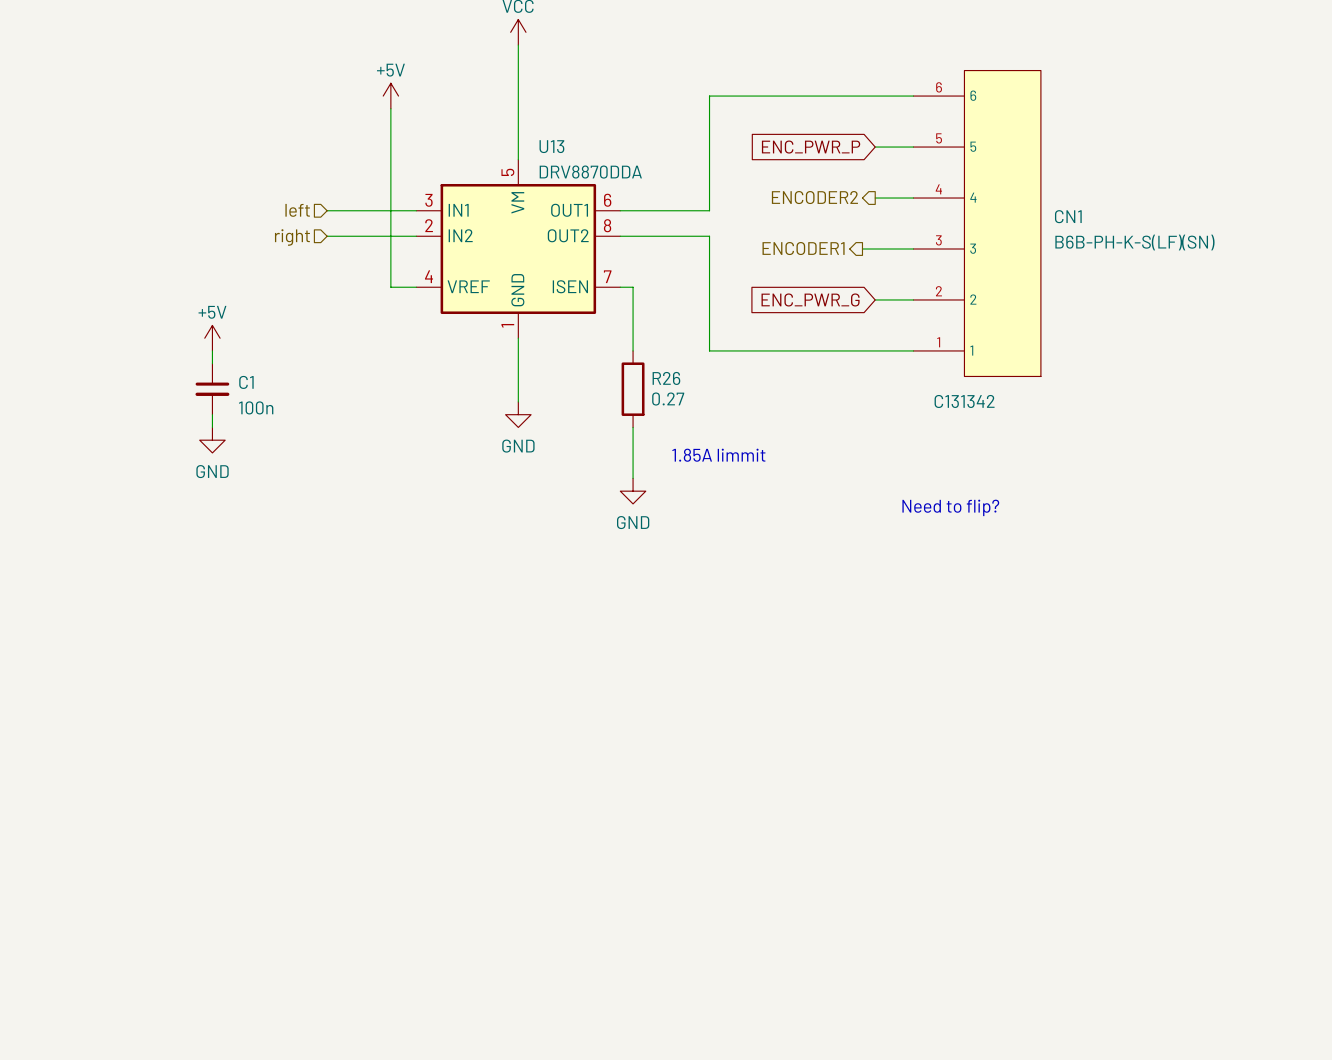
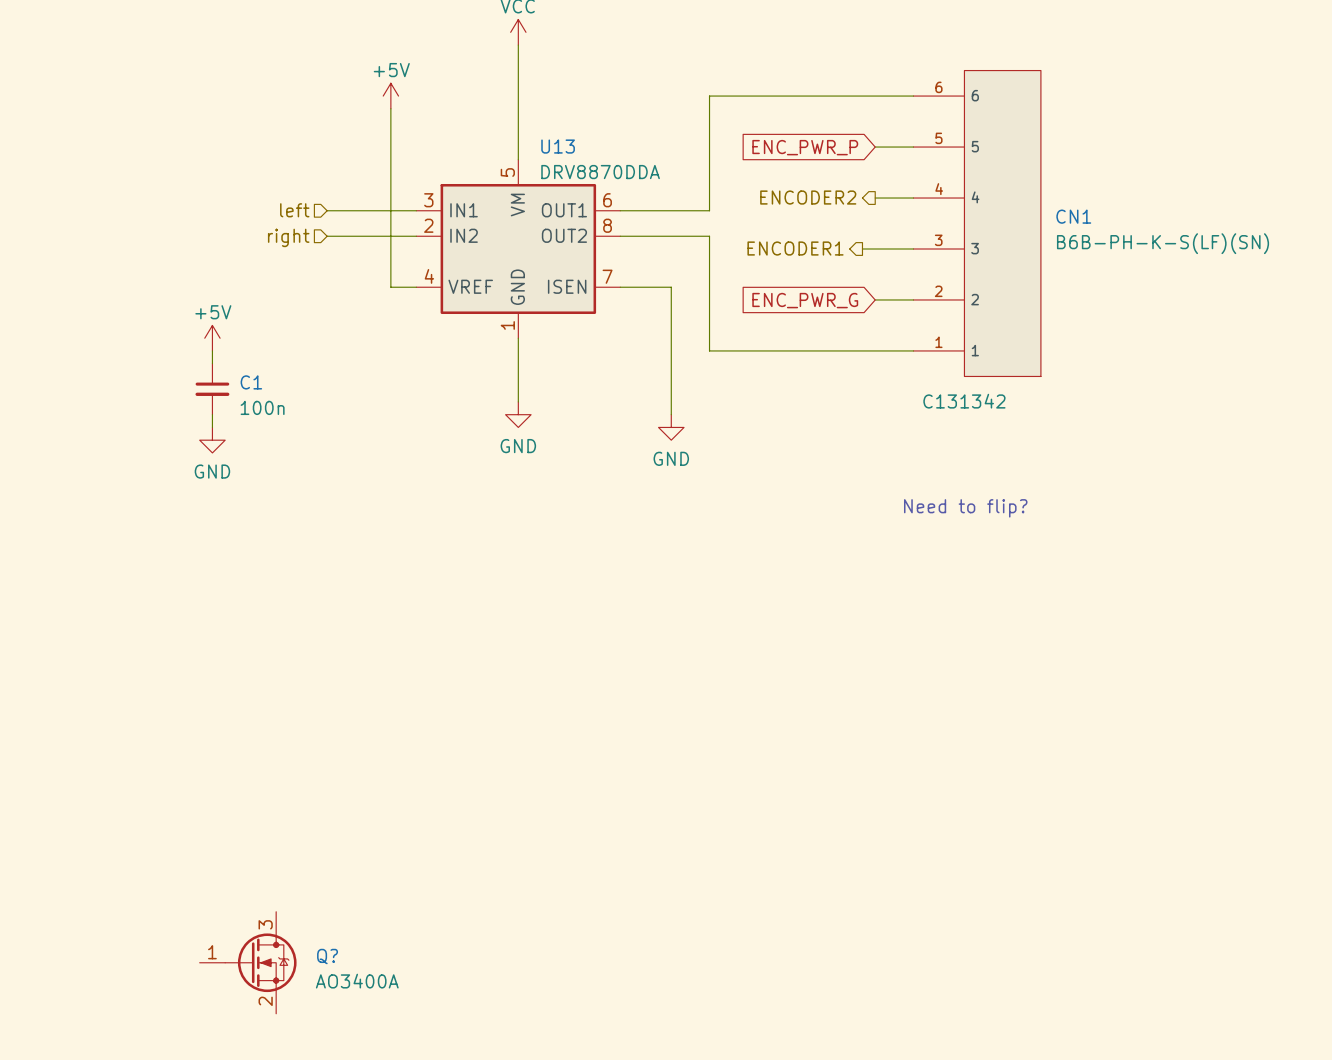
wire: (633, 287) (633, 350) -> (633, 287) (671, 287) (671, 414)
R26: 0.27 (633, 389) -> none
wire: (633, 427) (633, 478) -> none
text: 1.85A limmit (718, 455) -> none
power symbol position: GND (633, 491) -> GND (671, 427)
Q?: none -> AO3400A (248, 962)

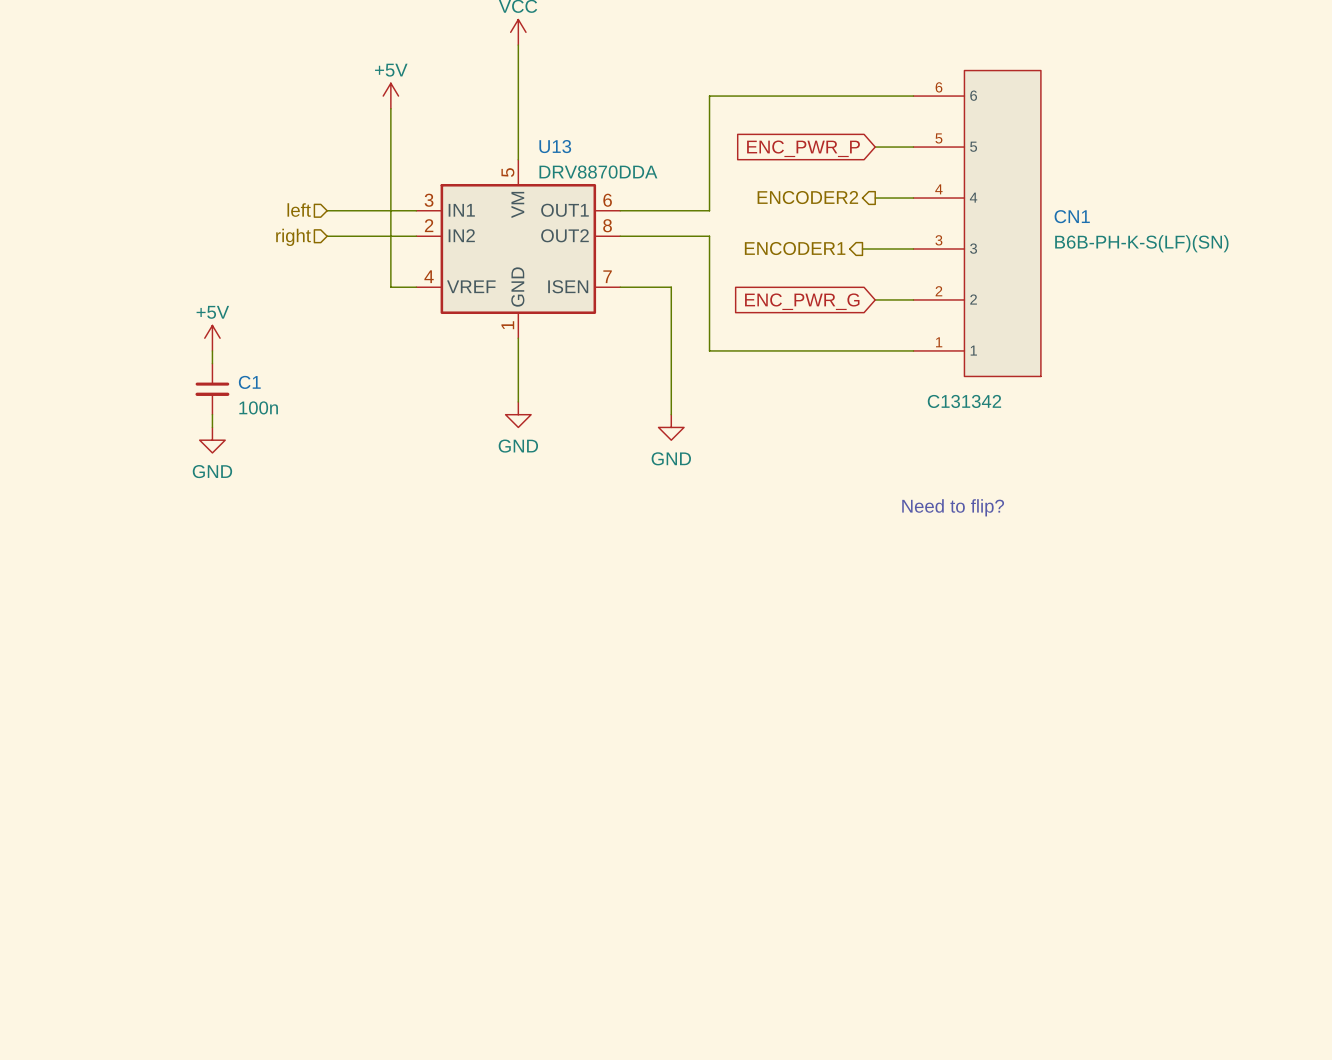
Q?: AO3400A (248, 962) -> none

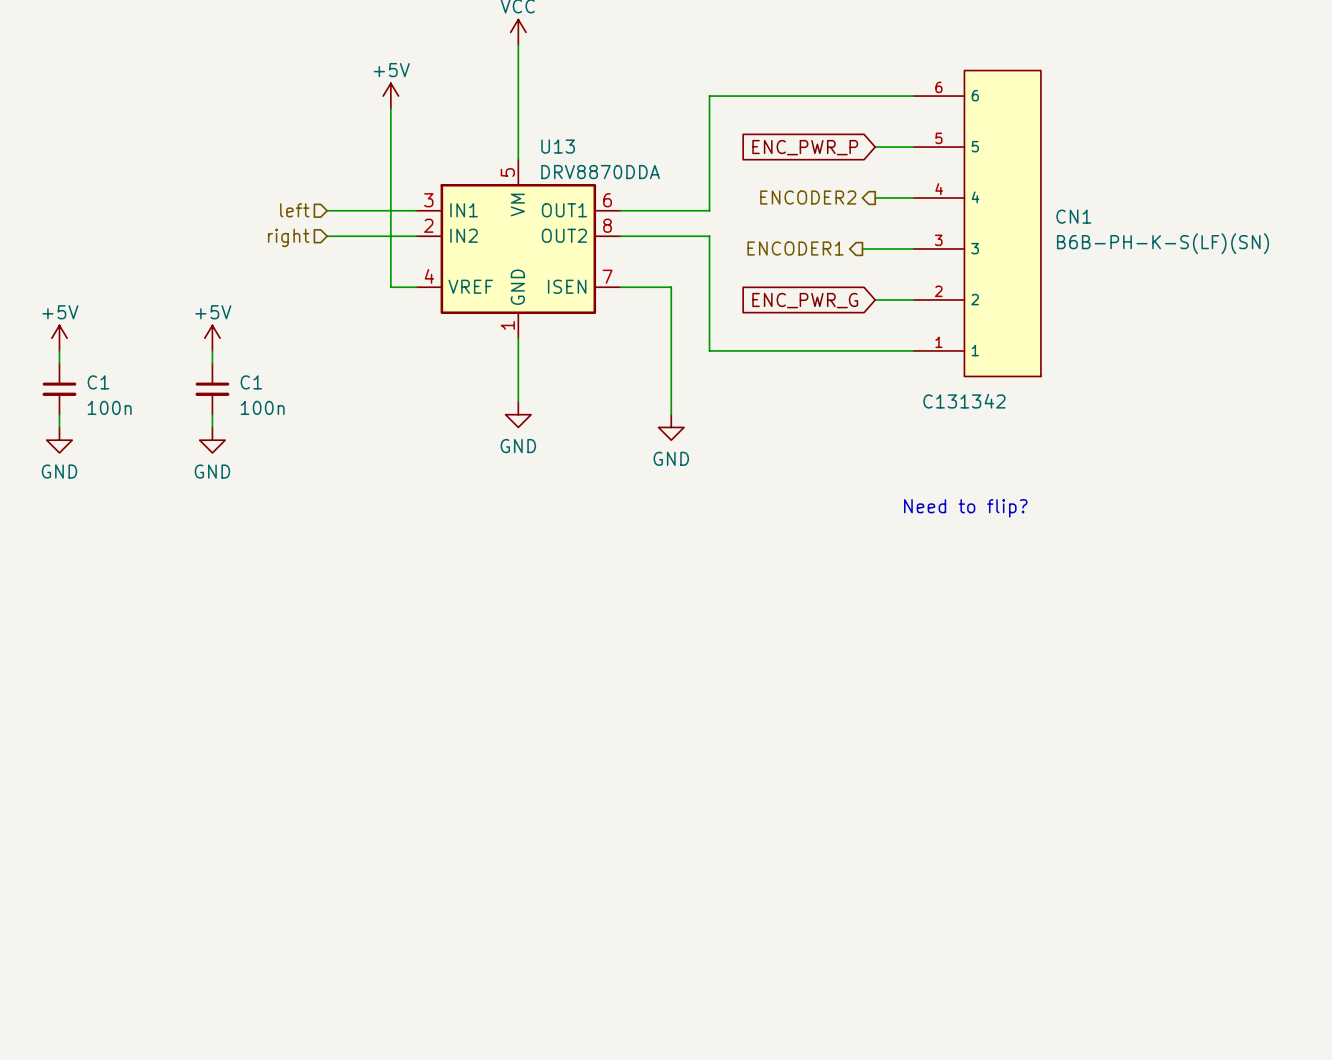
power symbol: none -> +5V (59, 338)
wire: none -> (59, 350) (59, 363)
C1: none -> 100n (59, 389)
wire: none -> (59, 414) (59, 427)
power symbol: none -> GND (59, 440)

